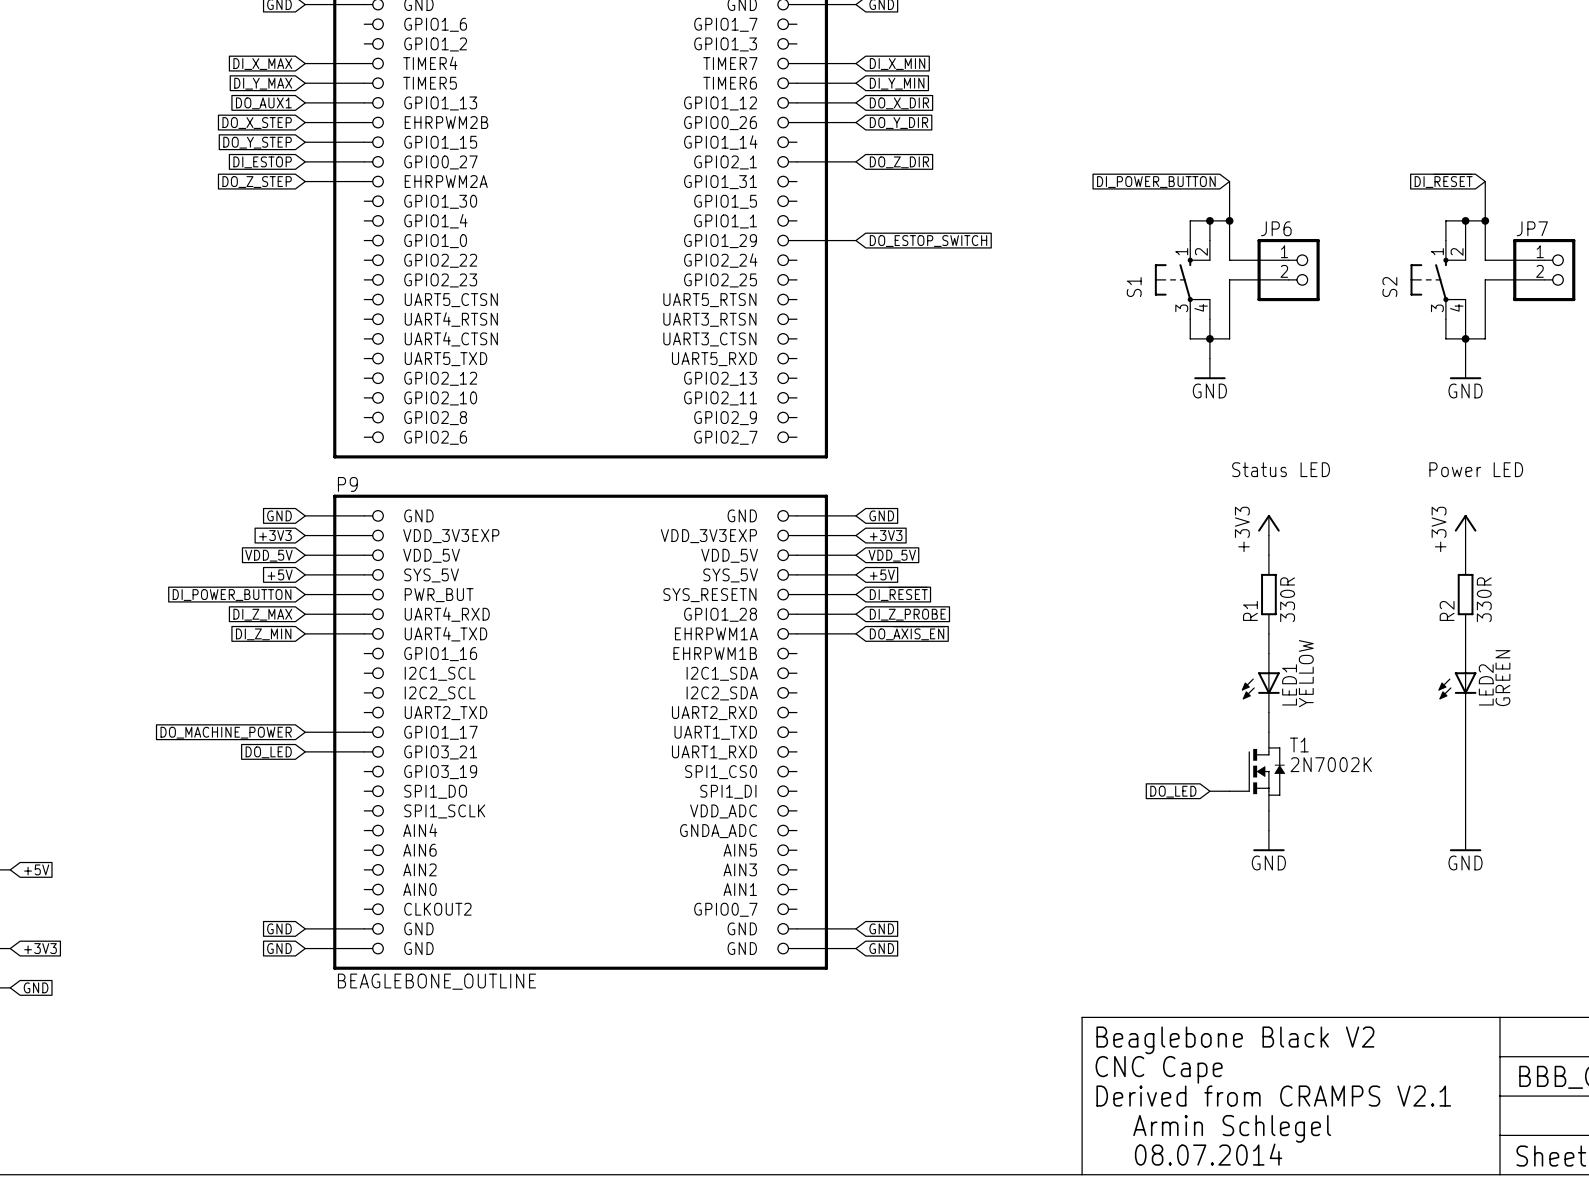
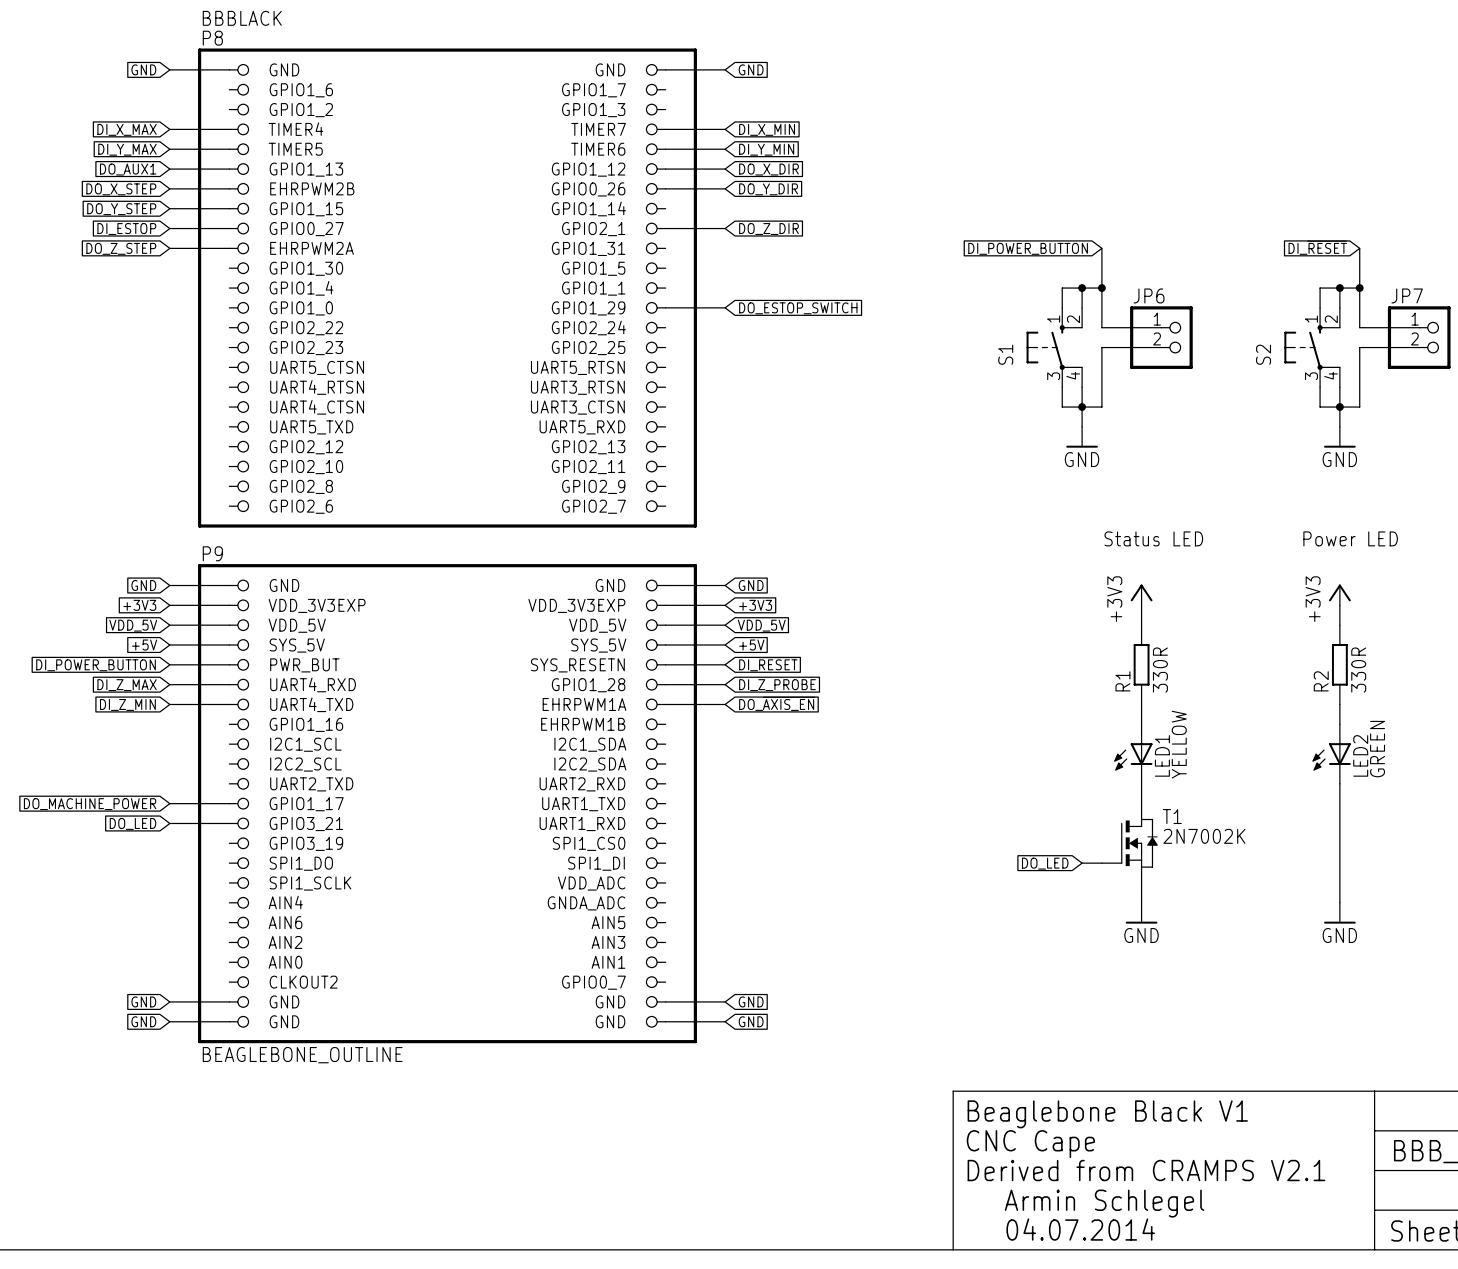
text: Beaglebone Black V2 (1235, 1040) -> Beaglebone Black V1 (1107, 1114)
text: 08.07.2014 (1208, 1154) -> 04.07.2014 (1080, 1229)

